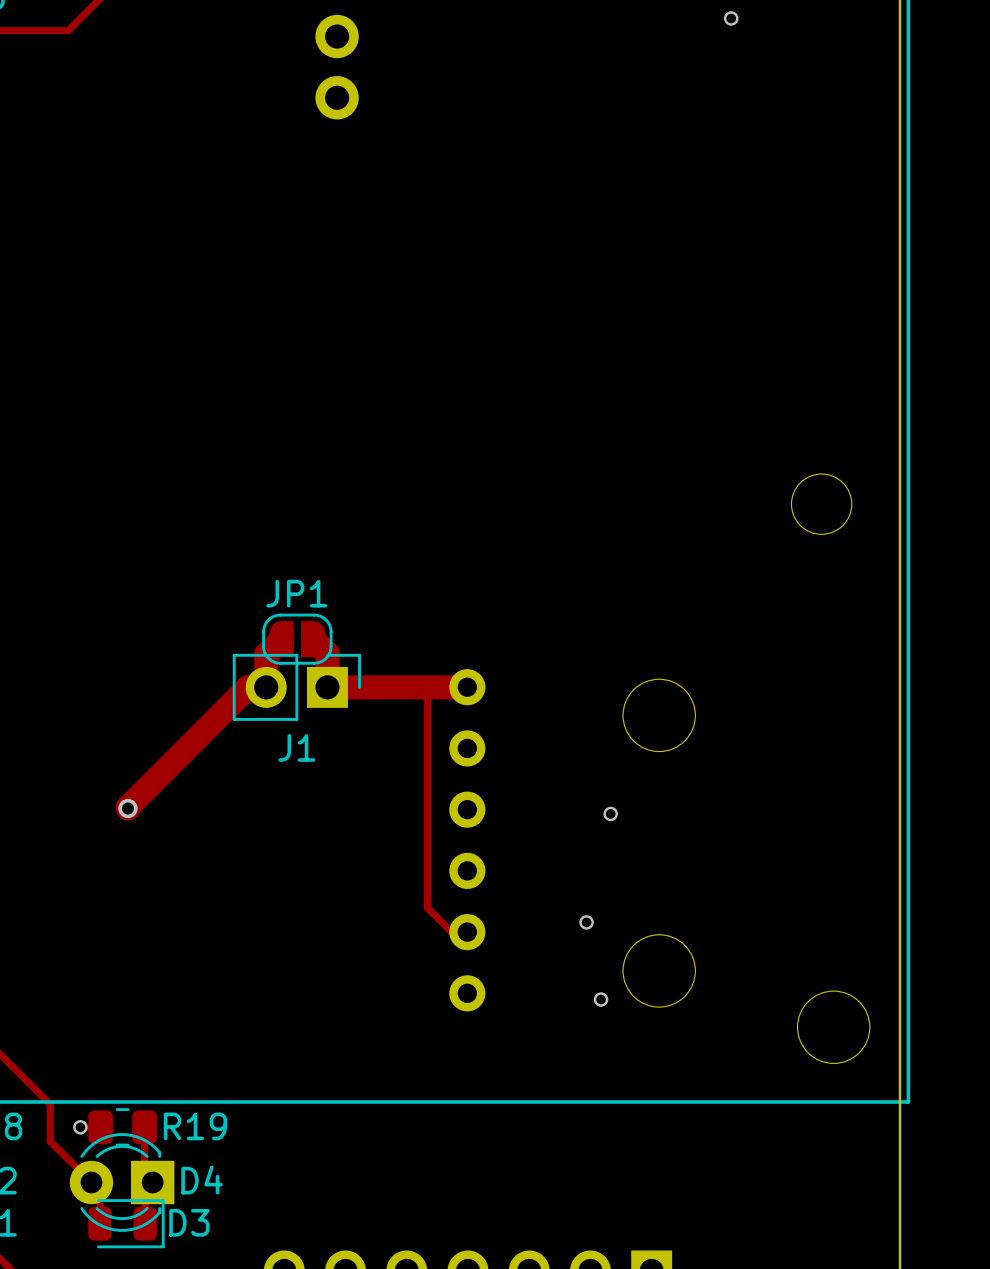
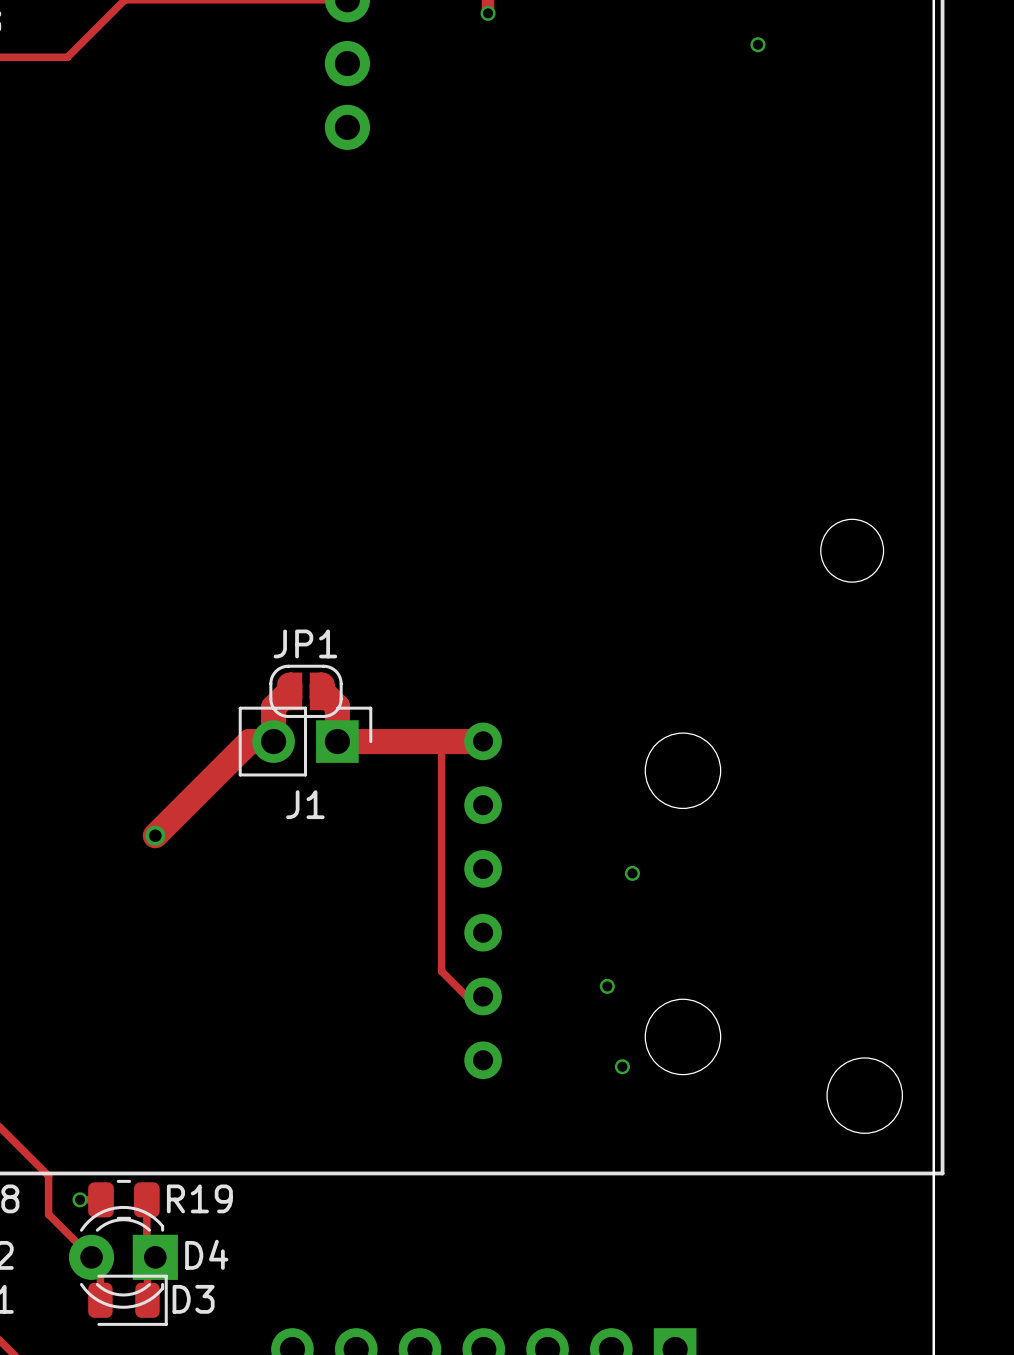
track: (247, 687) (127, 808) -> (254, 741) (249, 741) (155, 835)
via position: (127, 808) -> (155, 835)

